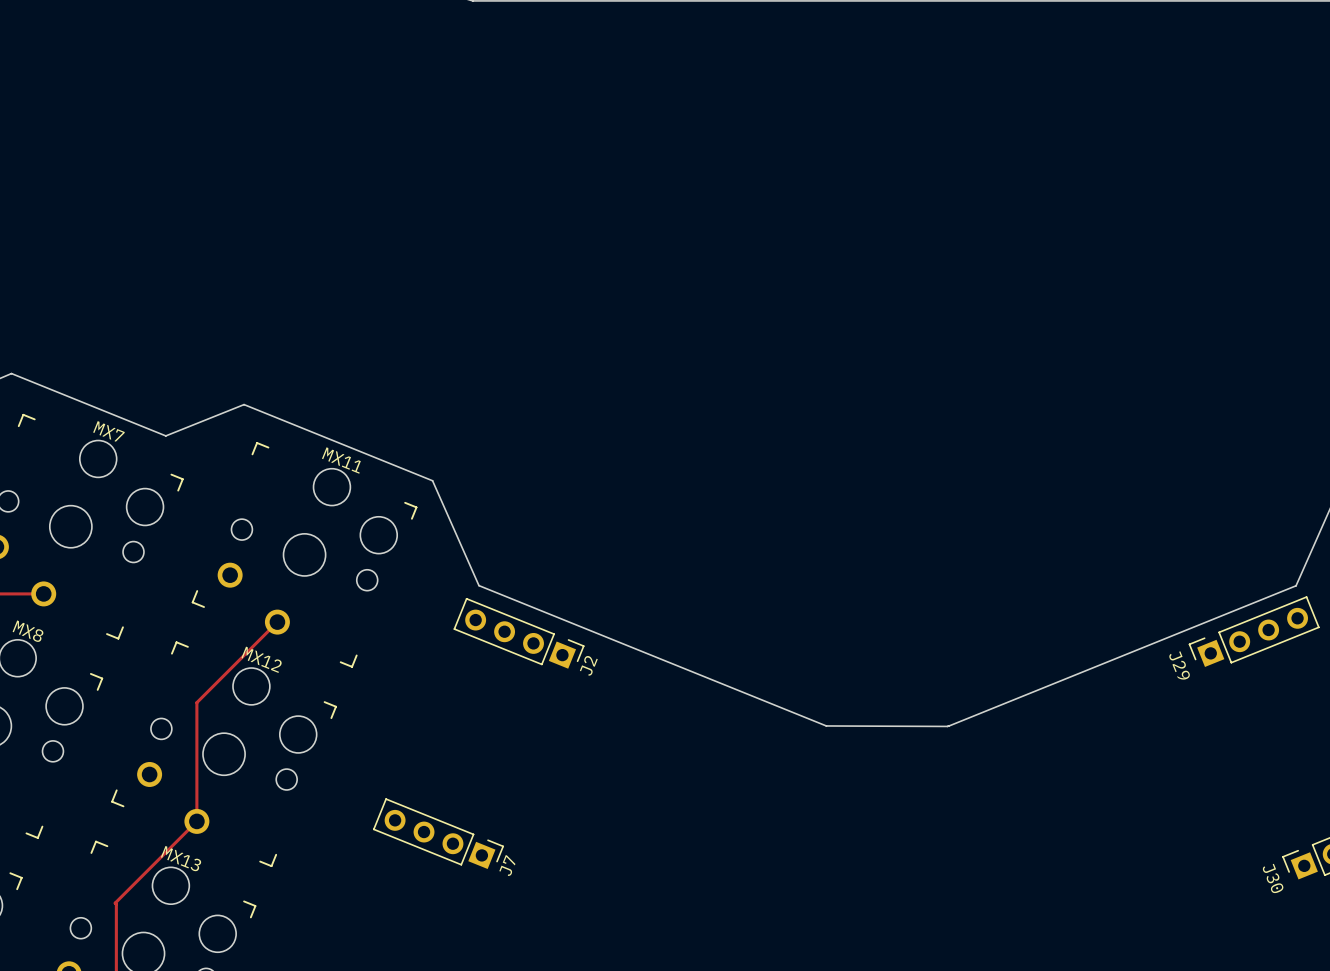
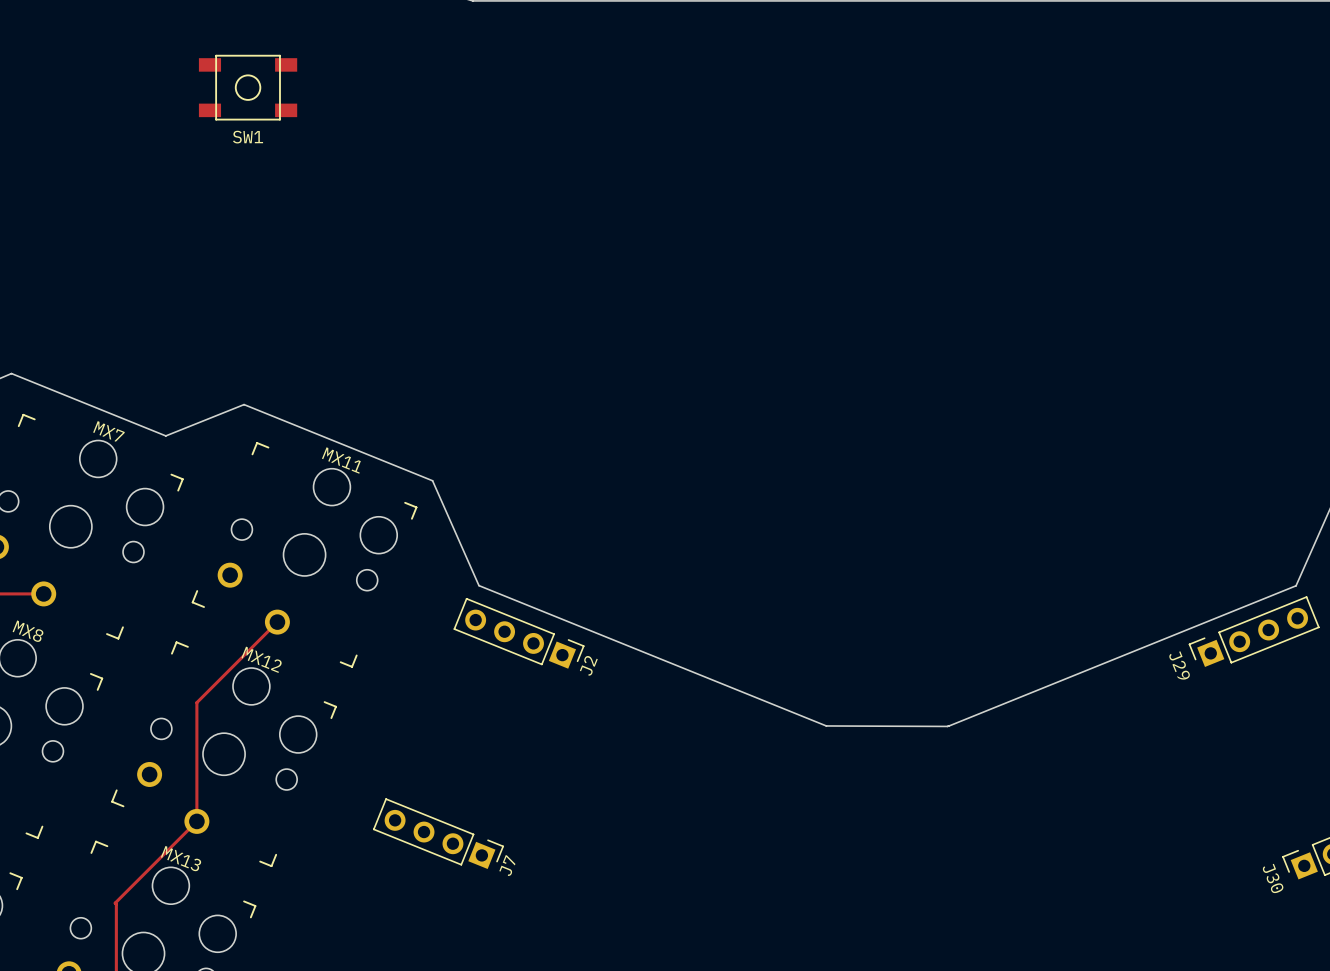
SW1: none -> (248, 87)

